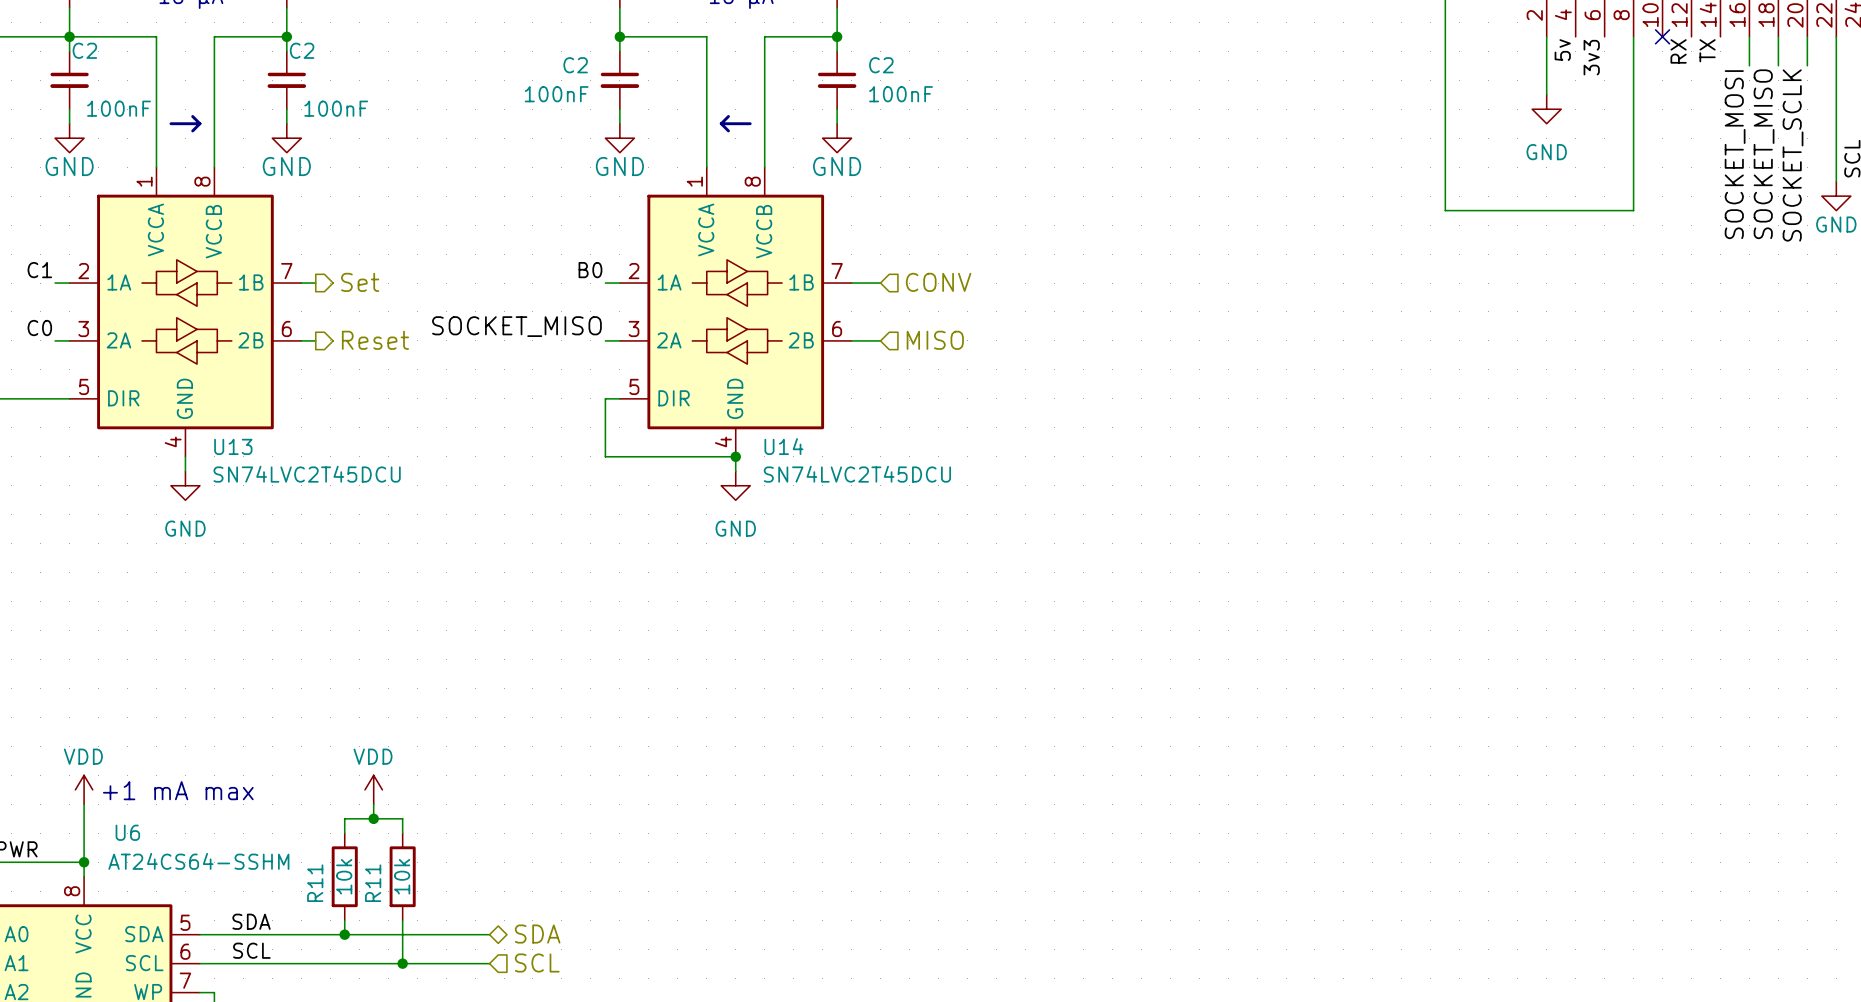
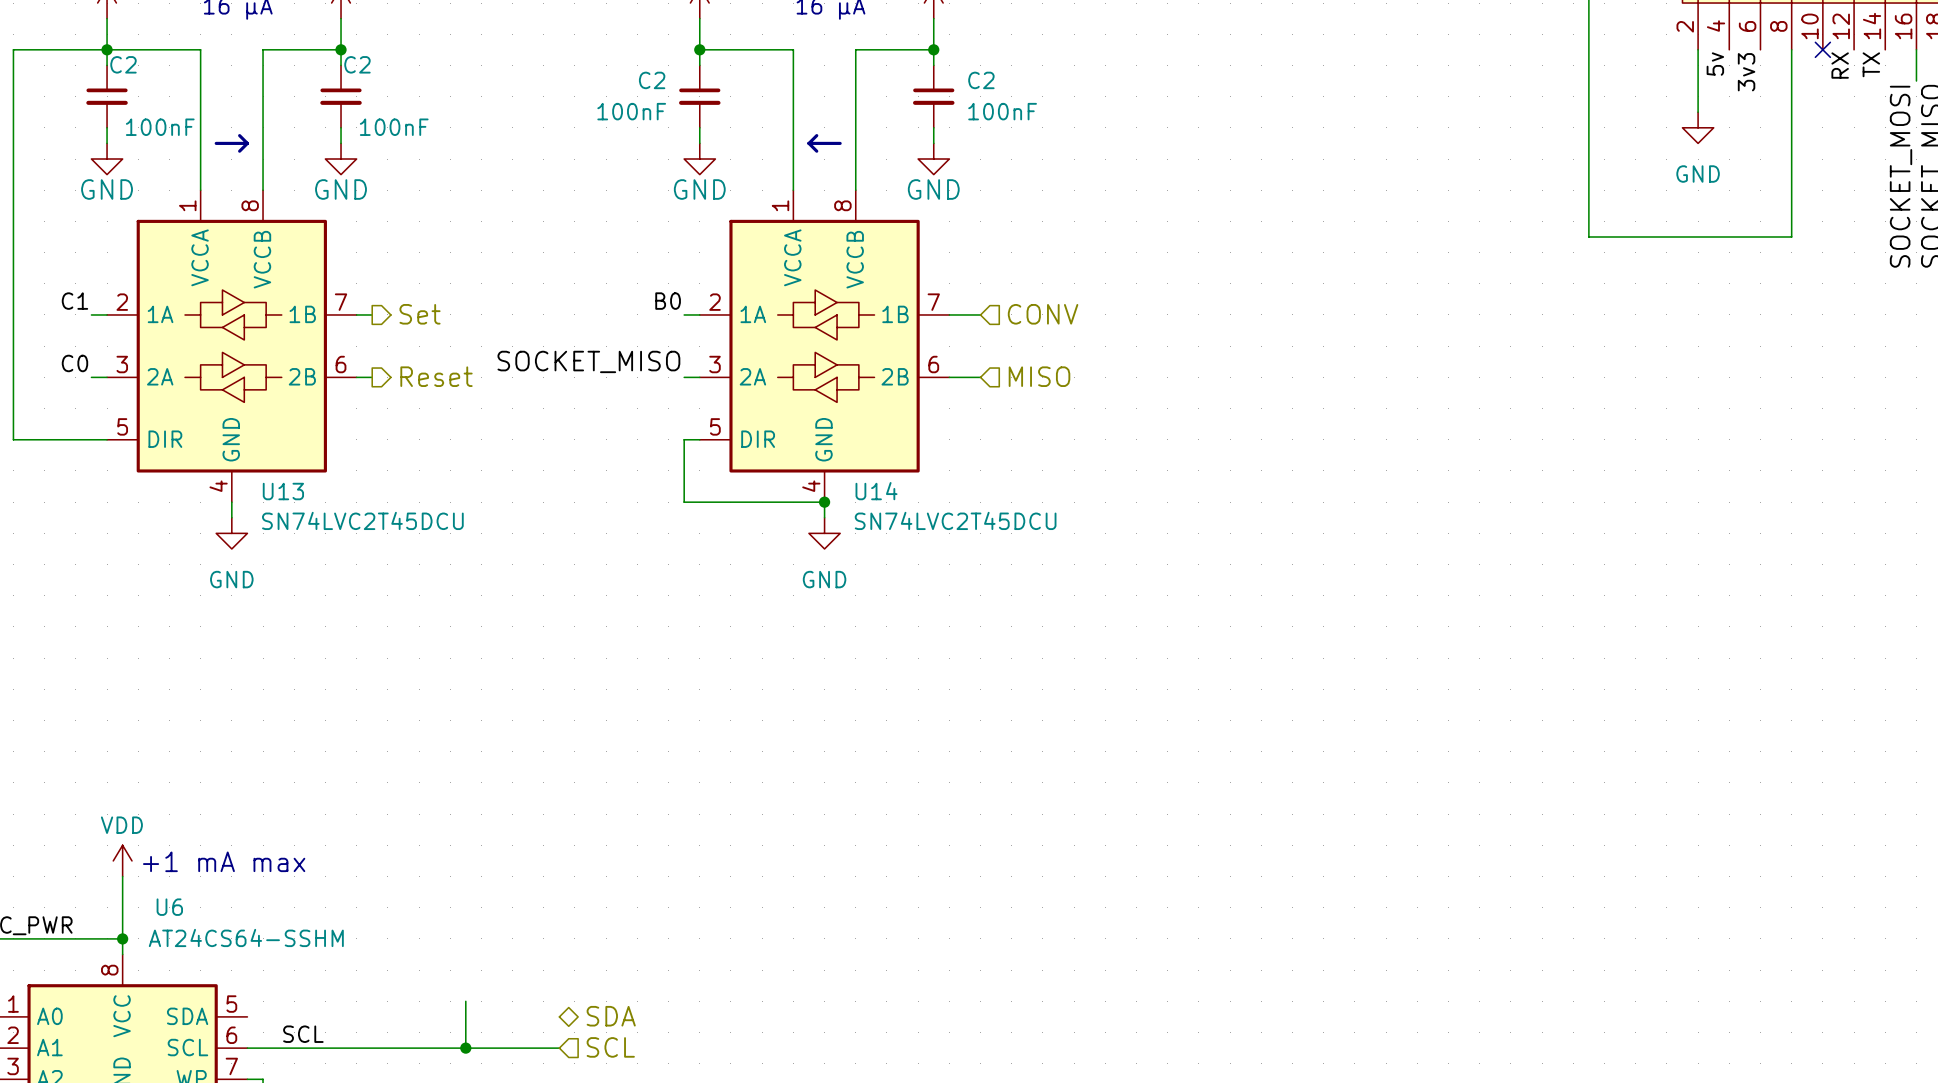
power symbol: VDD (373, 789) -> none
wire: (373, 804) (373, 818) -> none
junction: (373, 818) -> none
wire: (344, 833) (344, 818) (402, 818) (402, 833) -> none
R11: 10k (344, 876) -> none
R11: 10k (402, 876) -> none
wire: (344, 920) (344, 934) -> none
label: SDA (251, 921) -> none
wire: (199, 934) (489, 934) -> none
junction: (344, 934) -> none

